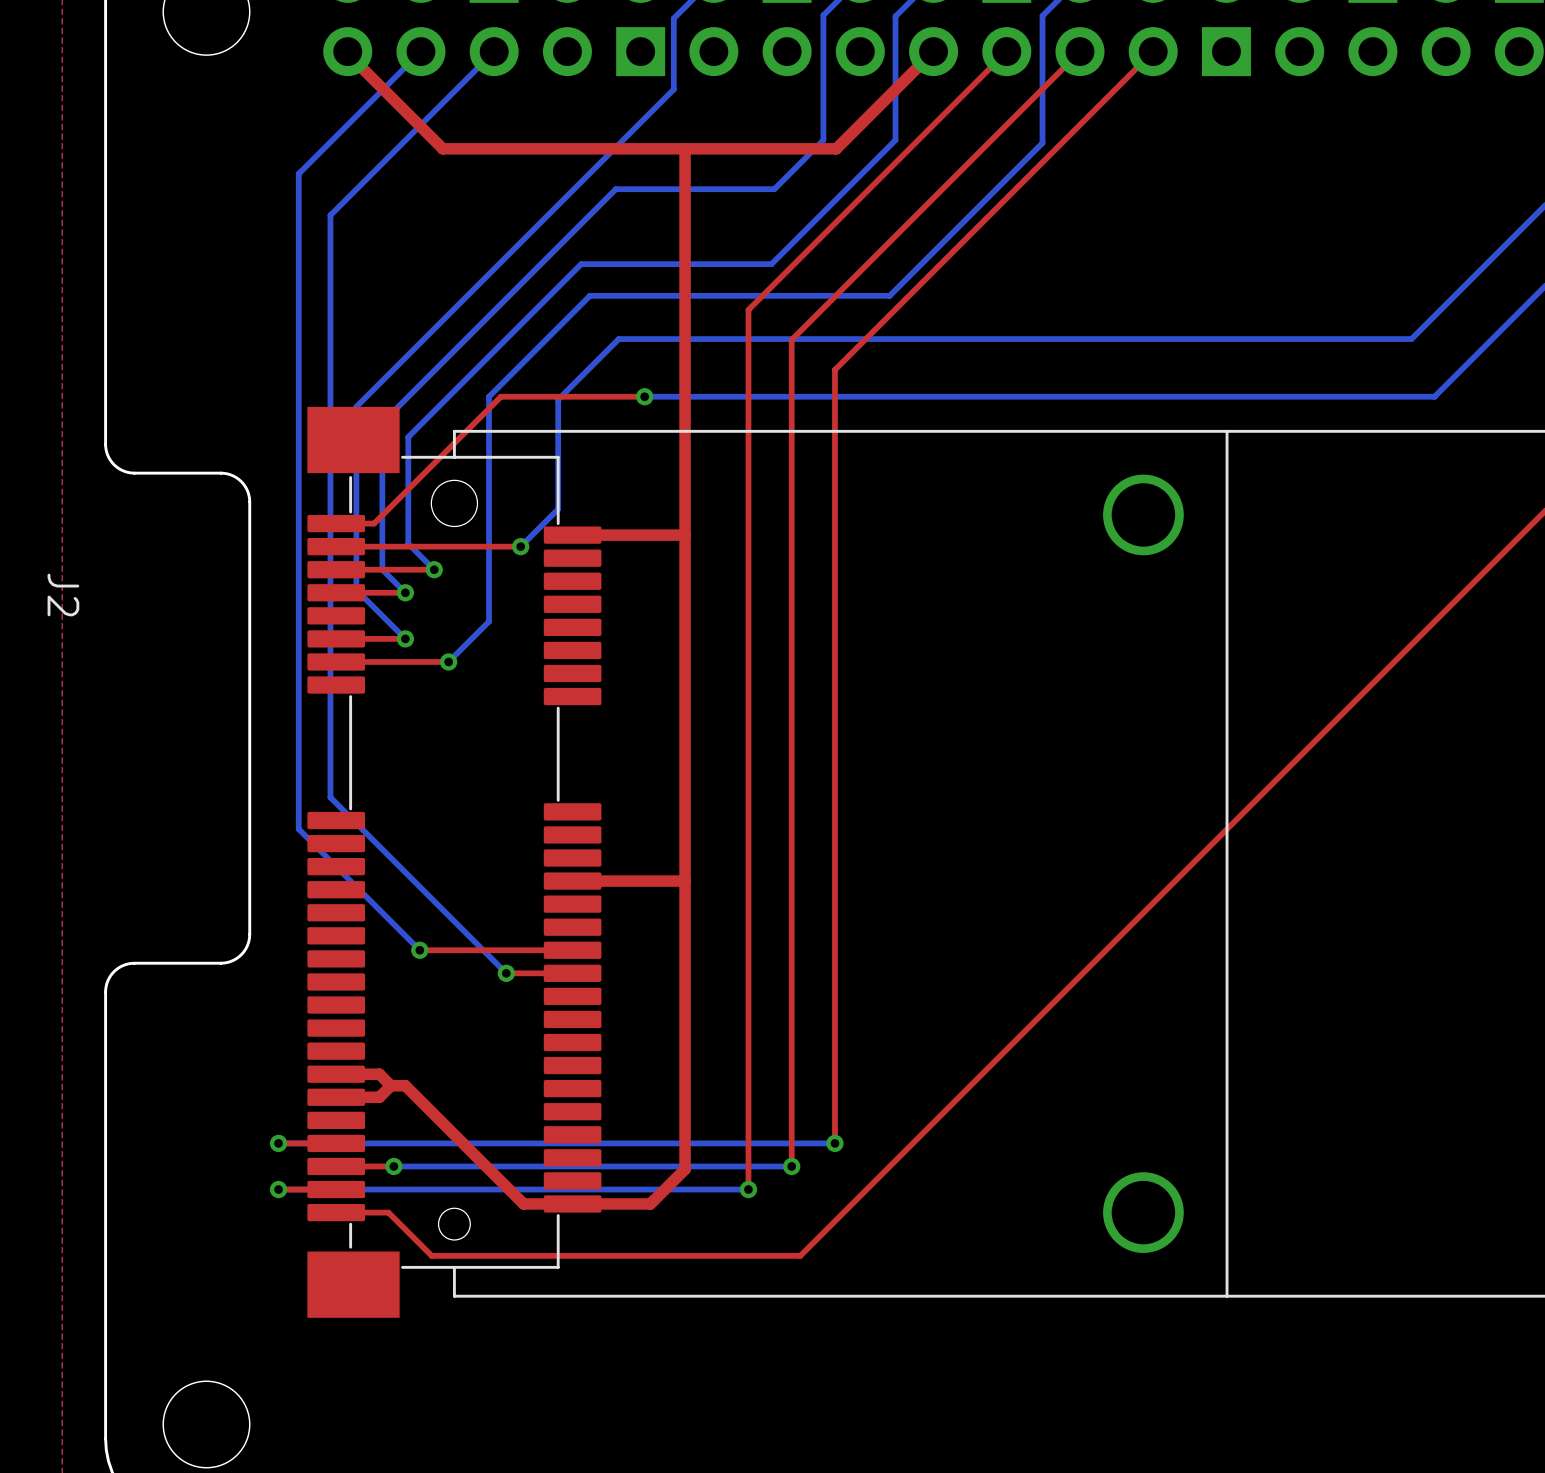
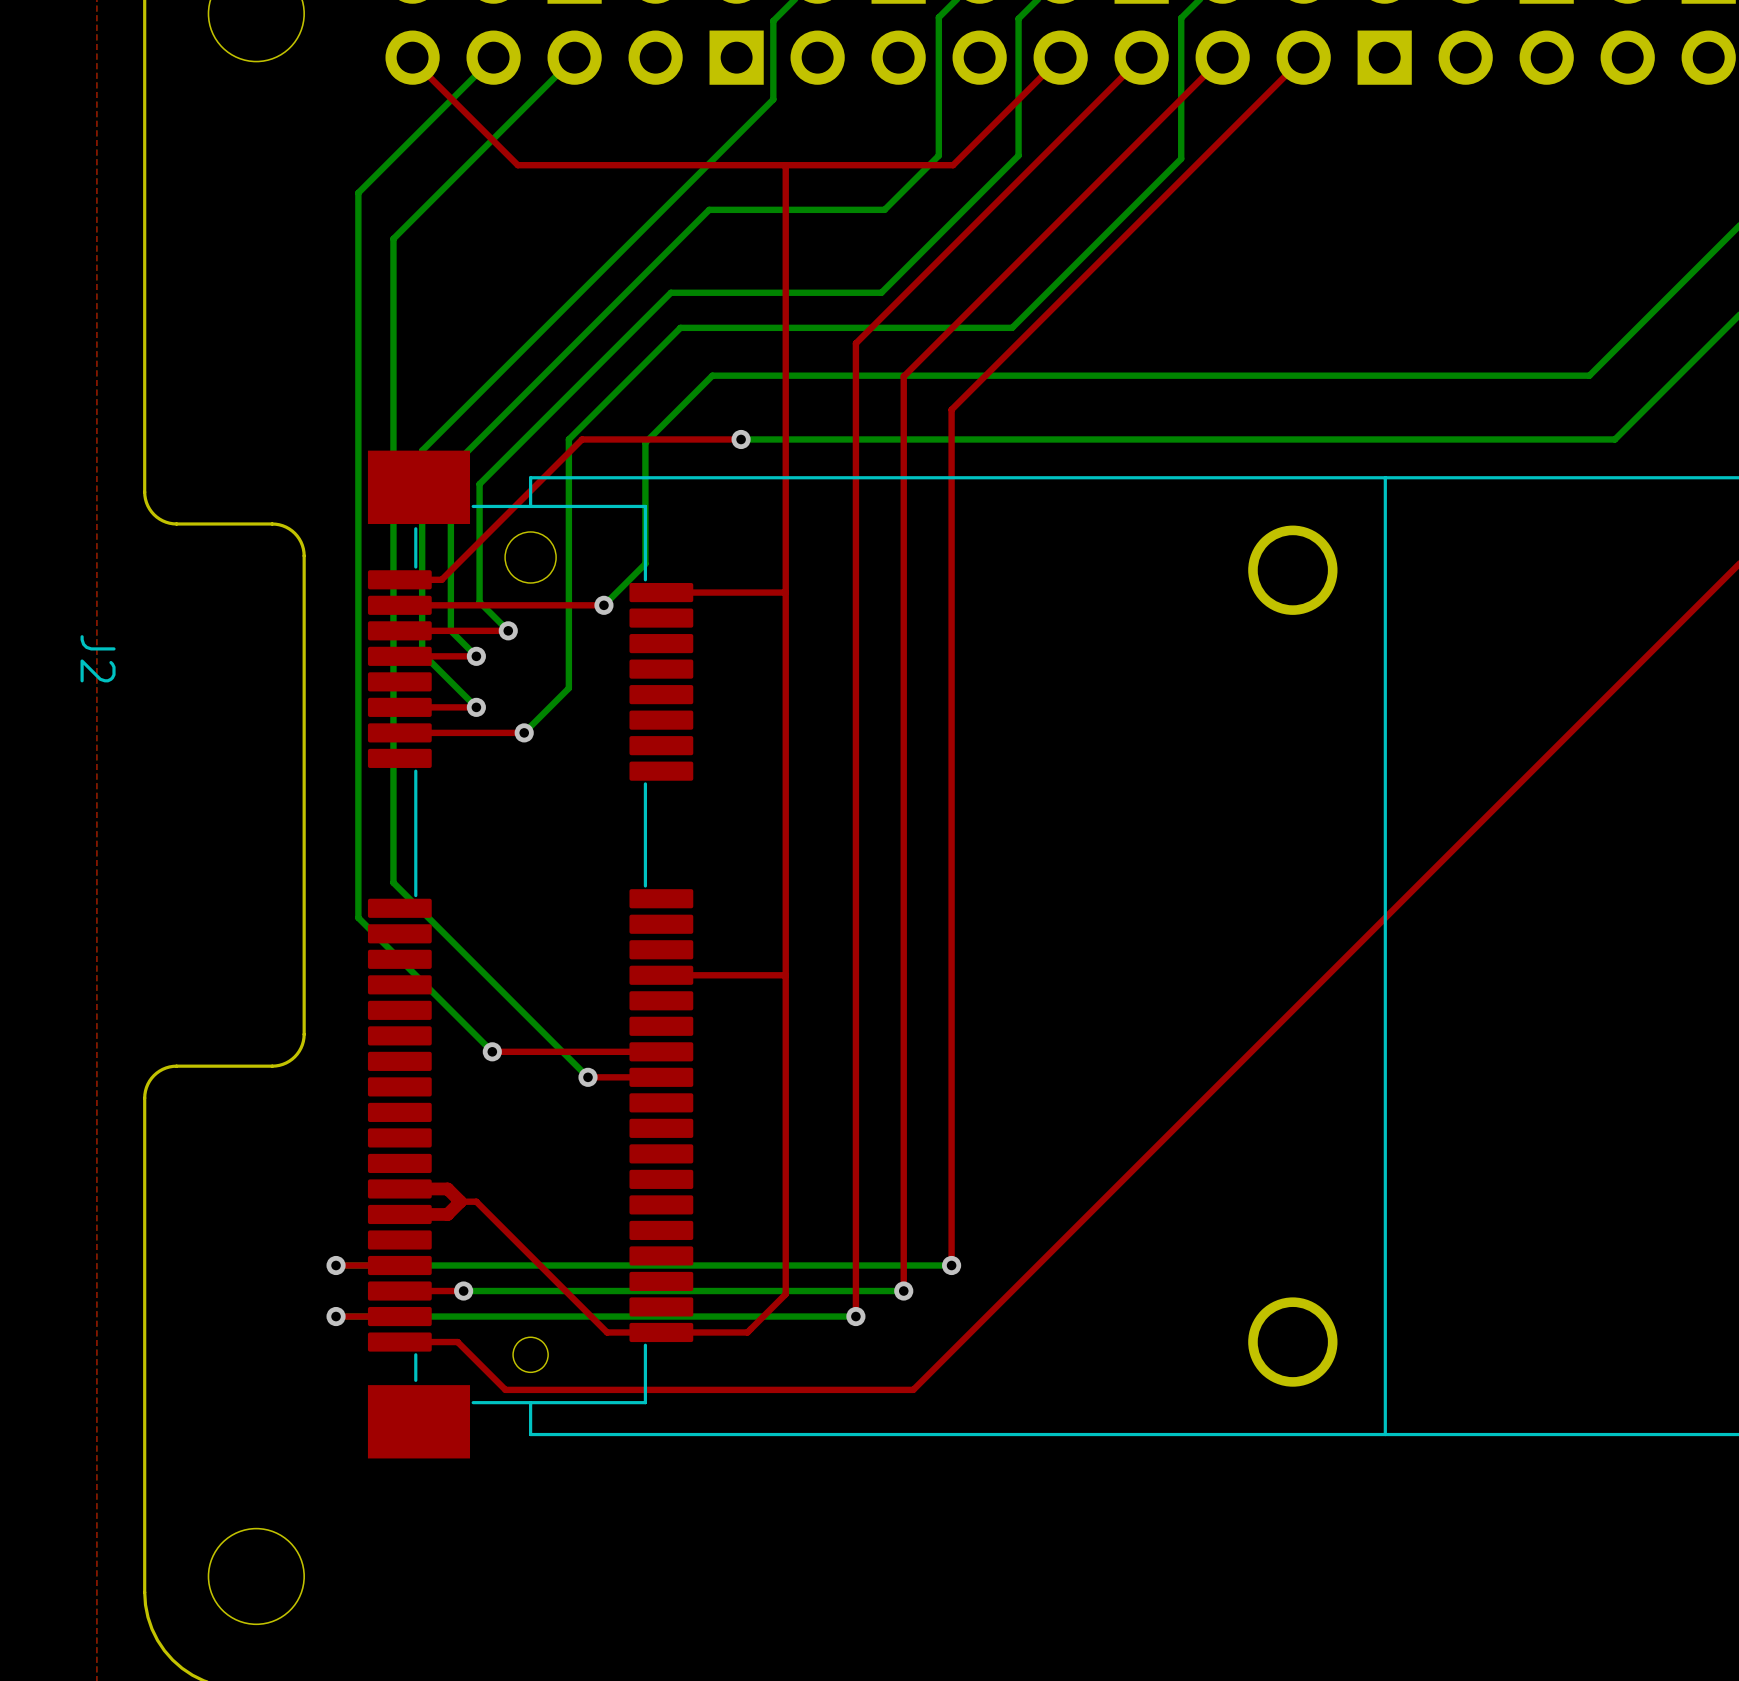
top track width: thick (347, 51) (442, 148) (836, 148) (933, 51) -> thin (412, 57) (412, 59) (517, 165) (953, 165) (1060, 57)
top track width: thick (685, 148) (685, 1169) (650, 1203) (523, 1203) (405, 1085) (390, 1085) -> thin (785, 165) (785, 1294) (747, 1332) (607, 1332) (476, 1201) (460, 1201)
top track width: thick (572, 535) (685, 535) -> thin (661, 592) (785, 592)
top track width: thick (572, 881) (685, 881) -> thin (661, 975) (785, 975)

